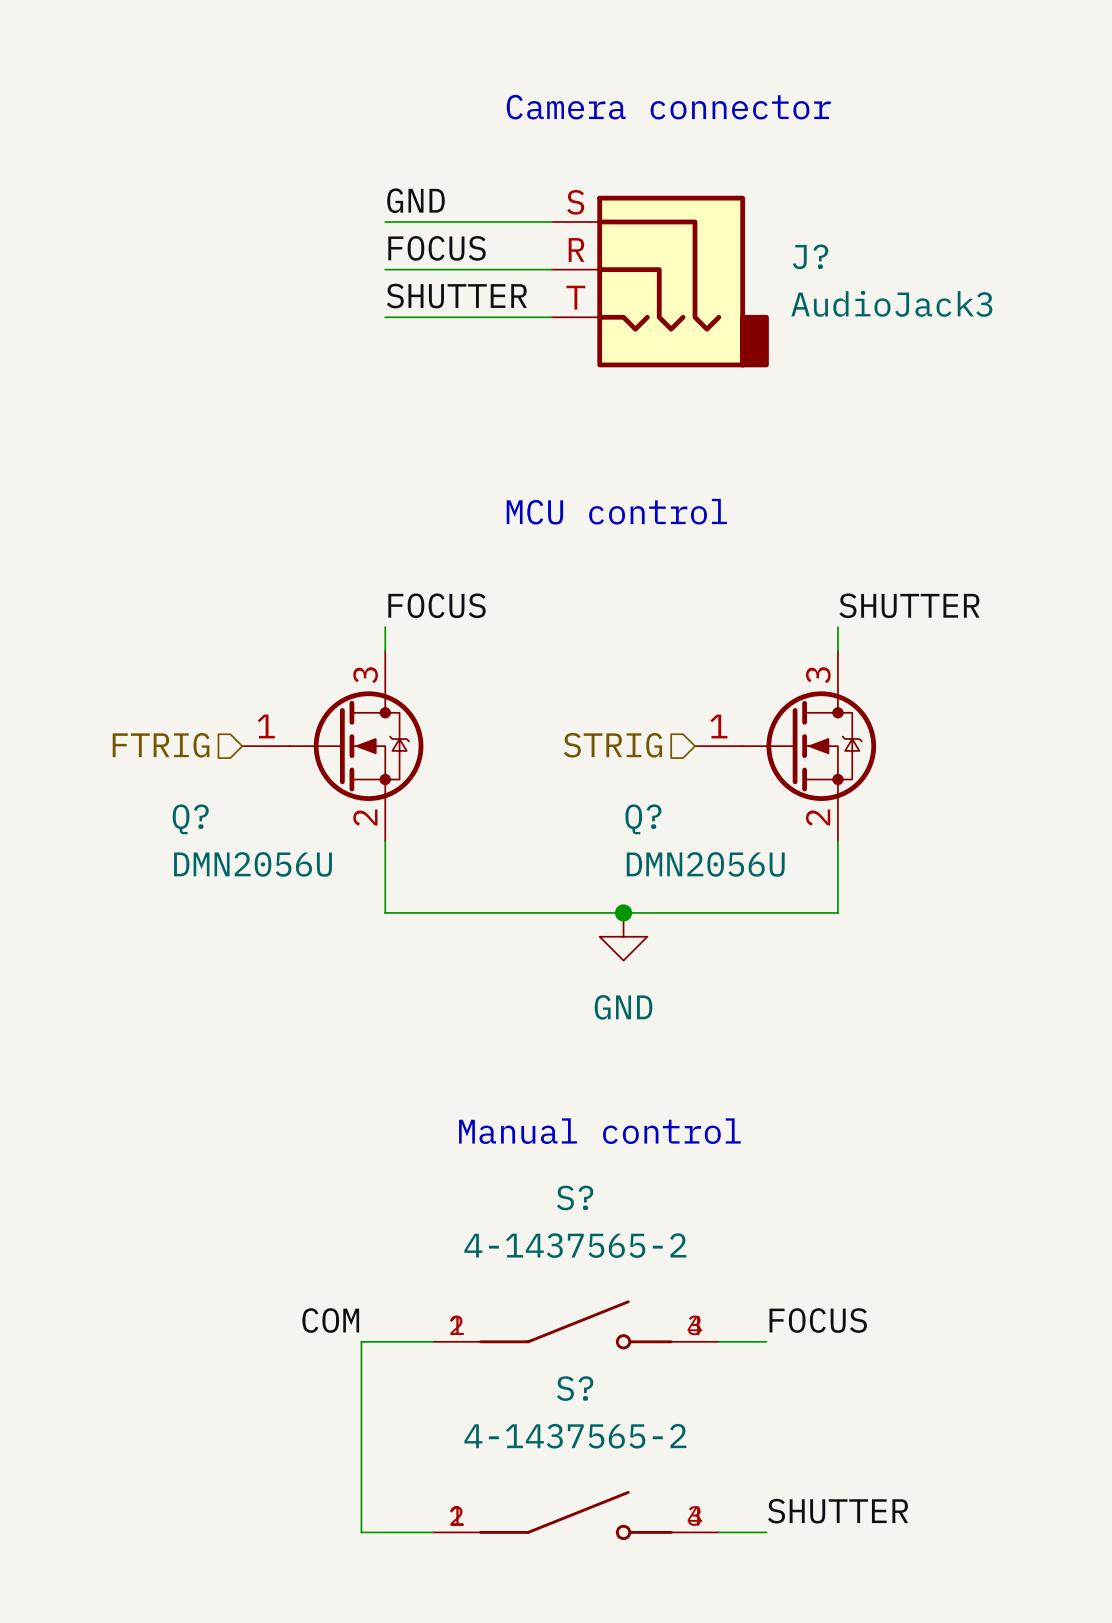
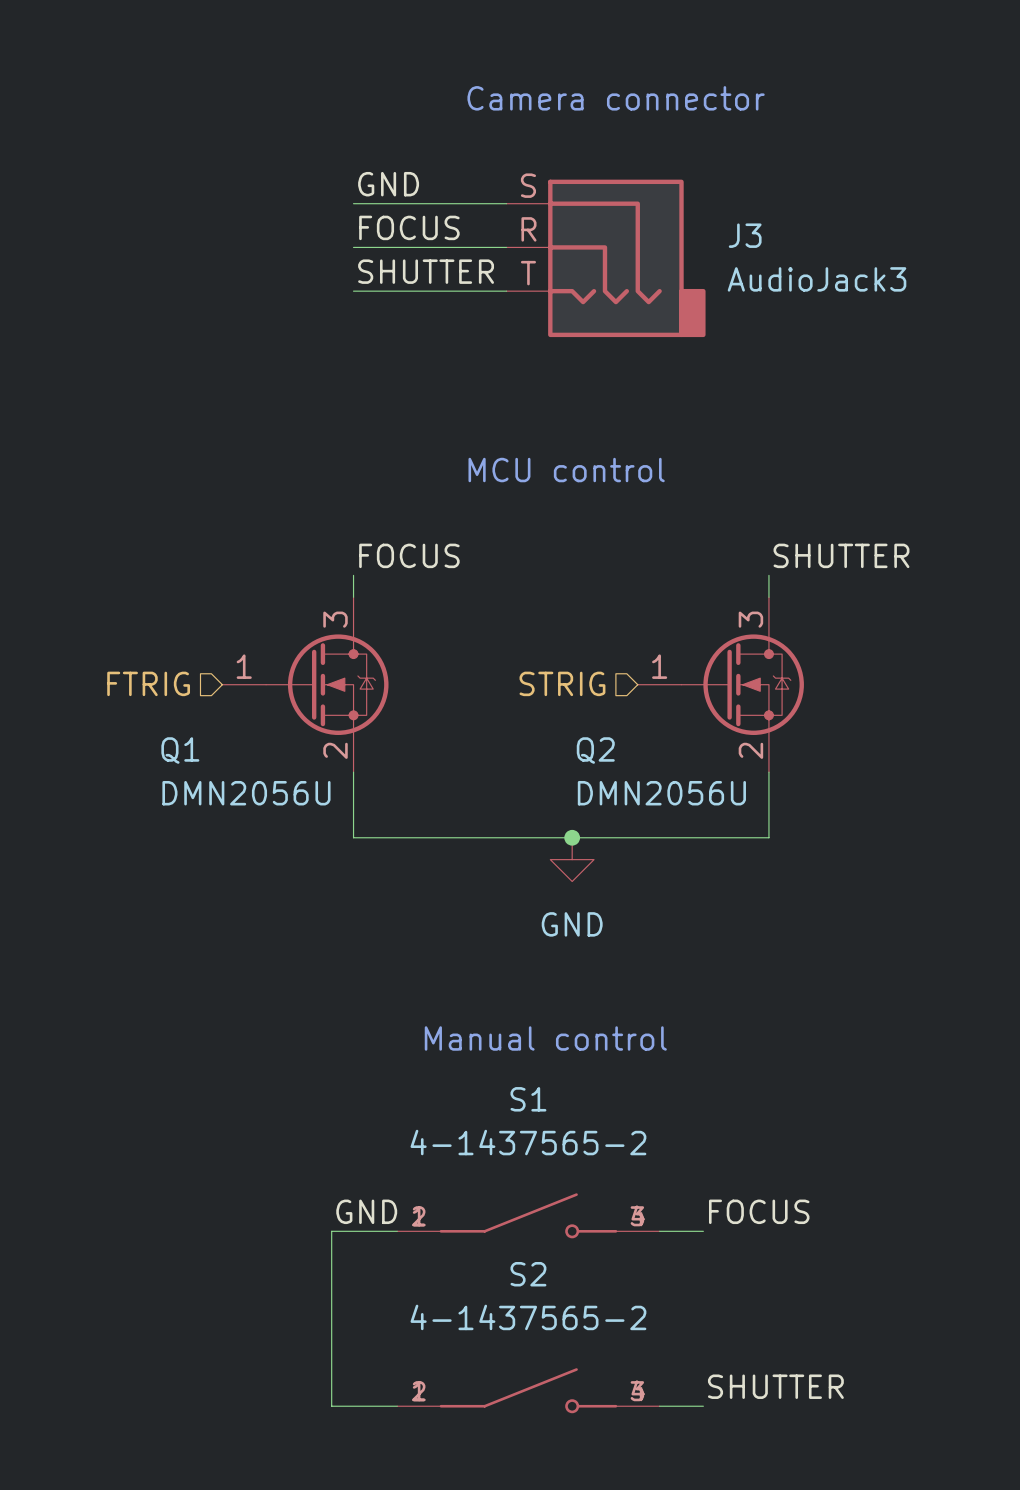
J? name: J? (810, 256) -> J3 (745, 235)
Q? name: Q? (190, 819) -> Q1 (180, 750)
Q? name: Q? (643, 819) -> Q2 (595, 750)
S? name: S? (575, 1197) -> S1 (528, 1099)
label: COM (330, 1320) -> GND (366, 1211)
S? name: S? (575, 1388) -> S2 (528, 1274)

